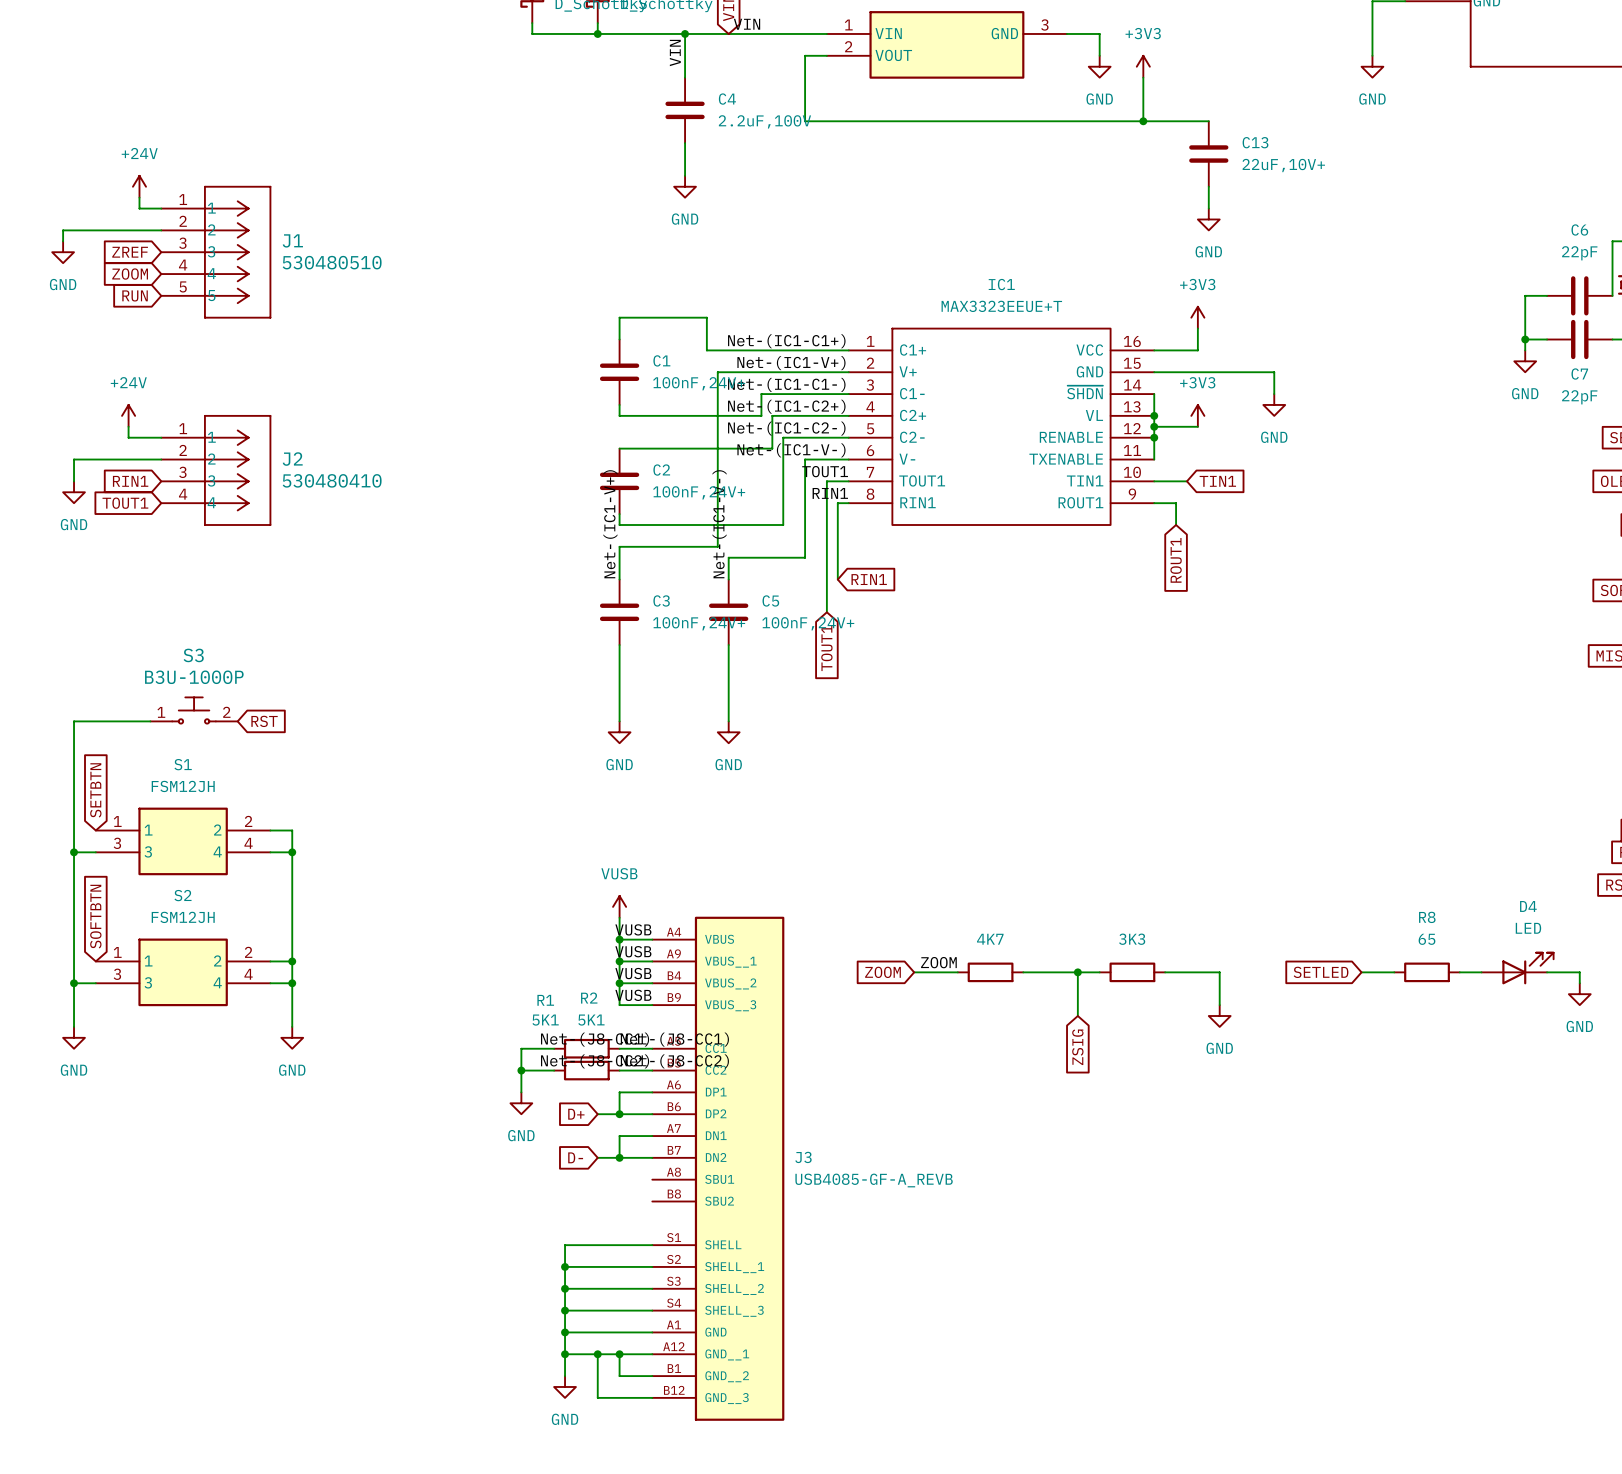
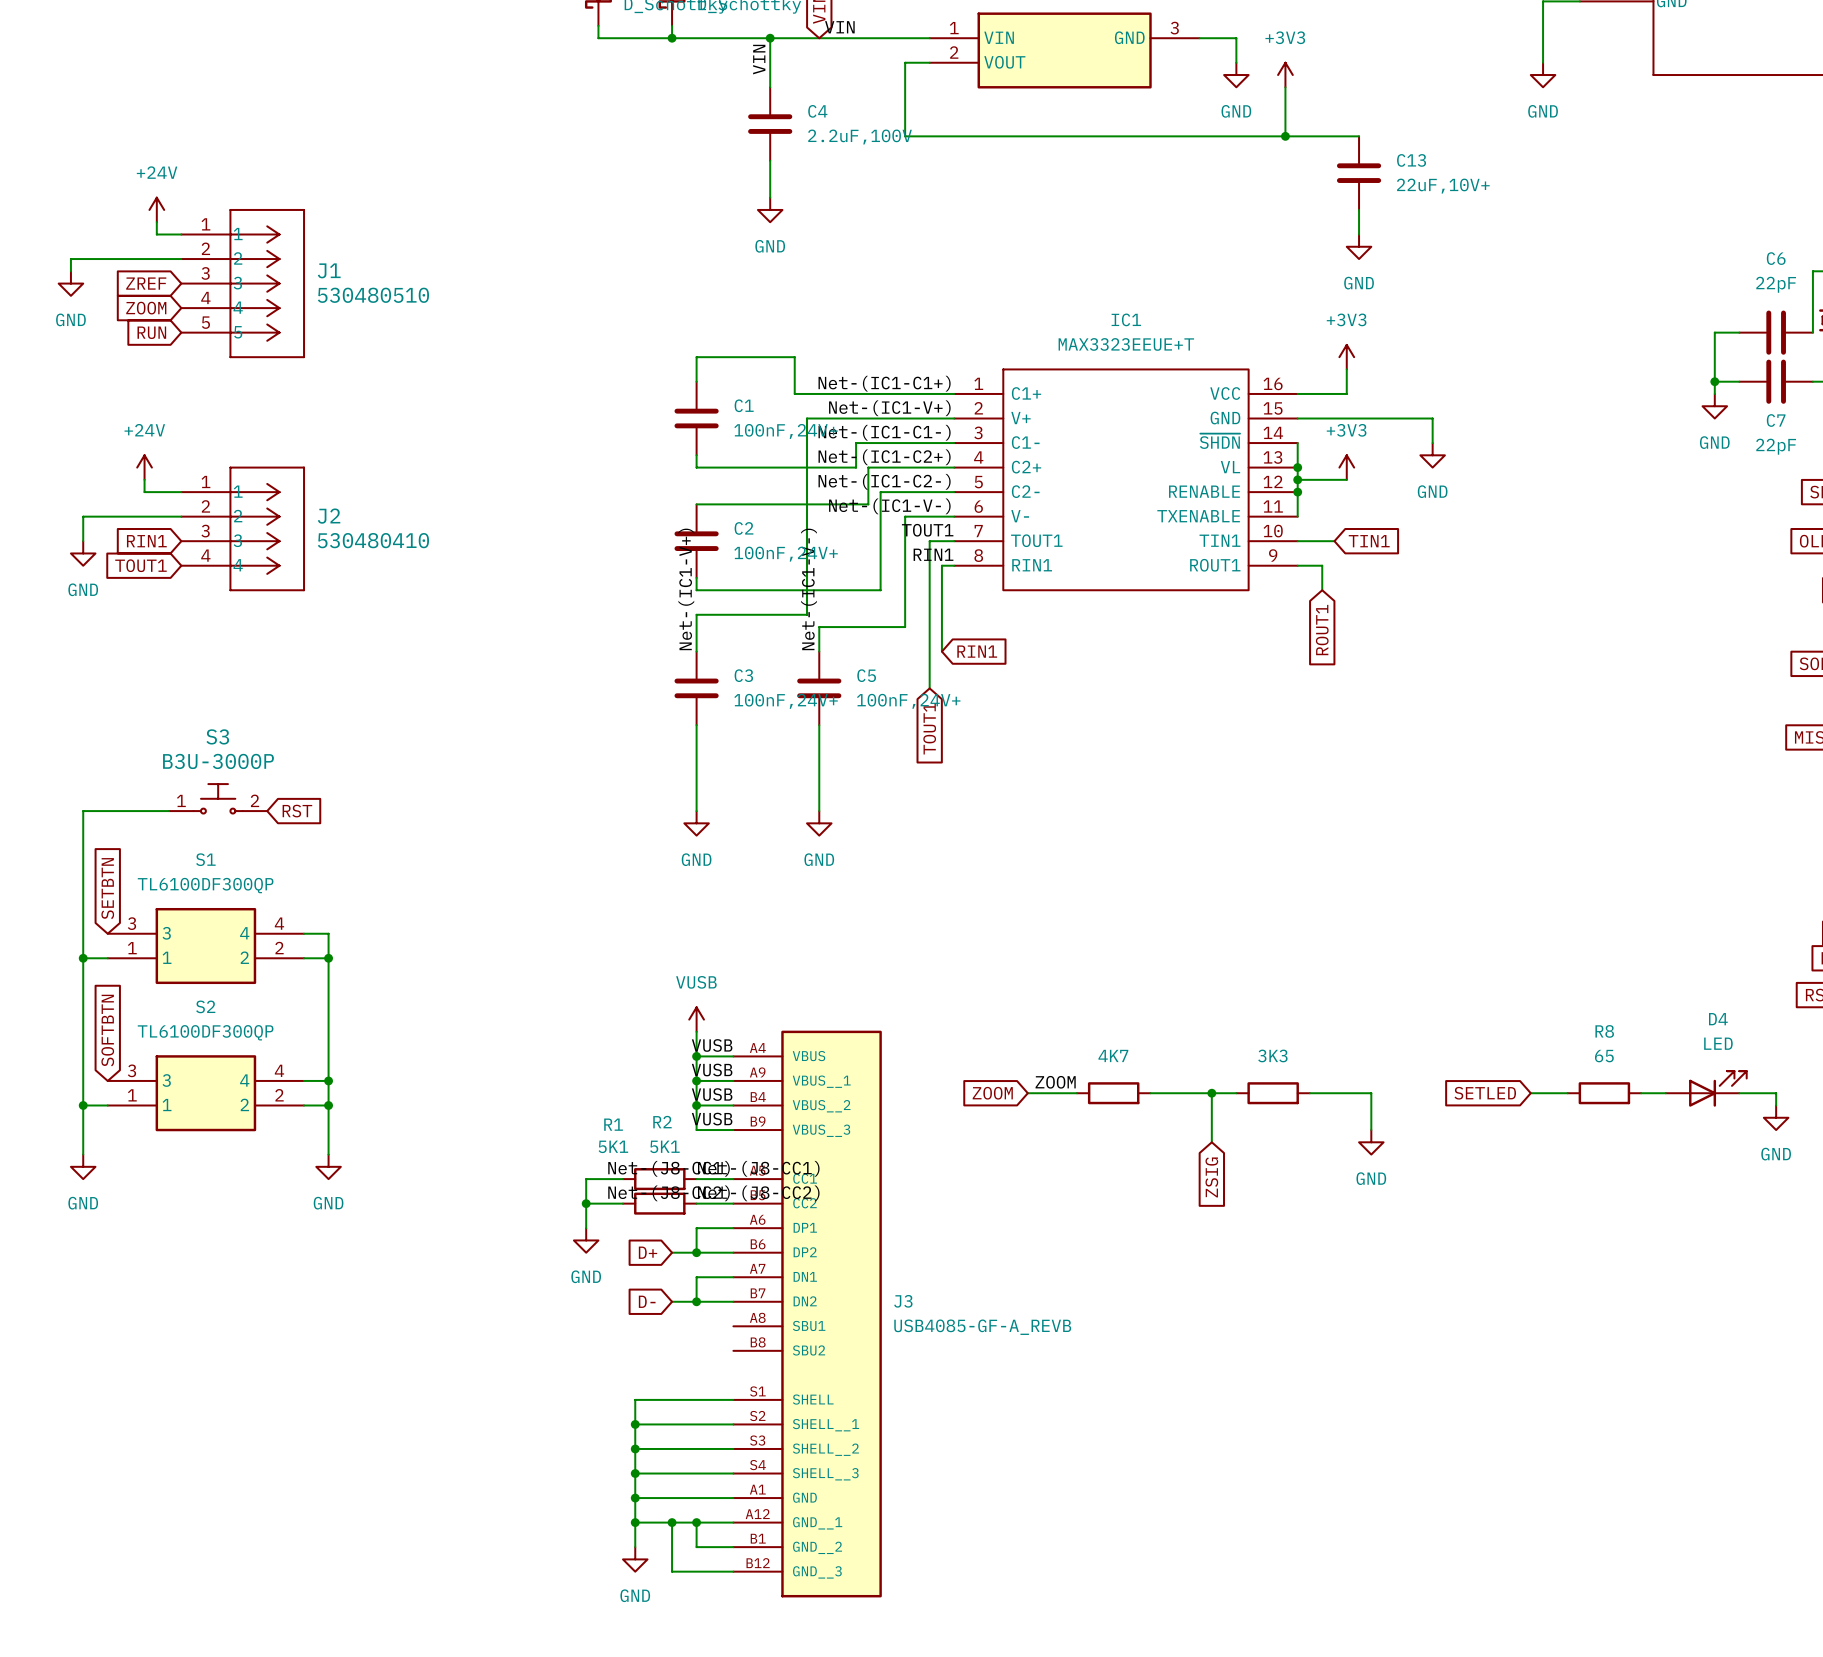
S3 value: B3U-1000P (194, 677) -> B3U-3000P (218, 761)
S1 value: FSM12JH (183, 786) -> TL6100DF300QP (205, 885)
S1 flip: as is (183, 841) -> up-down (205, 946)
S2 value: FSM12JH (183, 917) -> TL6100DF300QP (205, 1032)
S2 flip: as is (183, 972) -> up-down (205, 1093)

